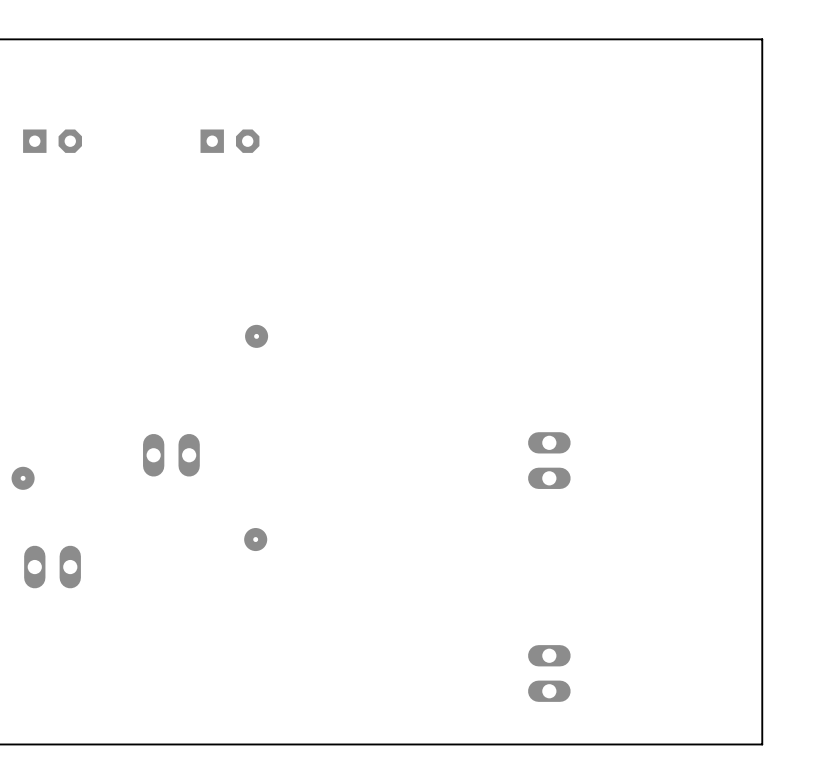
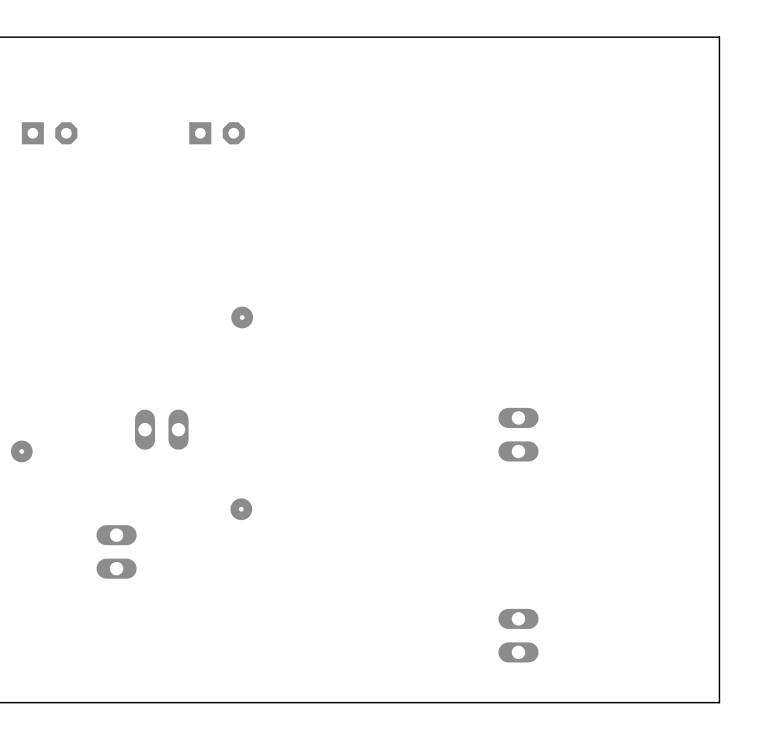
part rotation: 0° (52, 567) -> 90° clockwise (116, 551)
part position: (52, 567) -> (116, 551)

